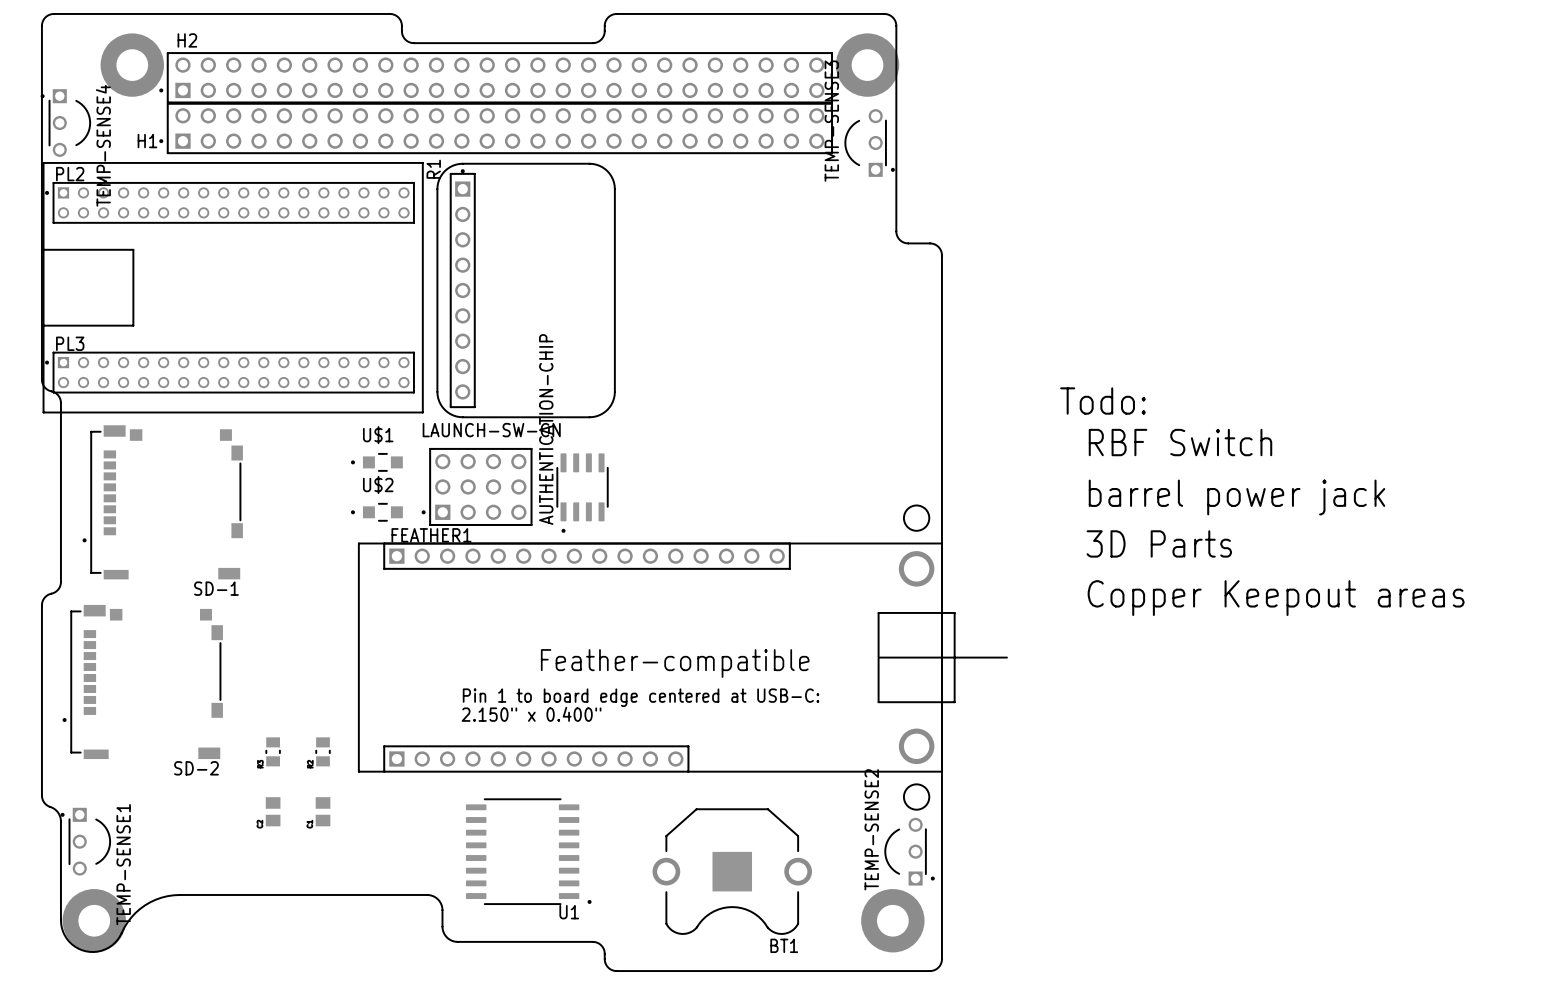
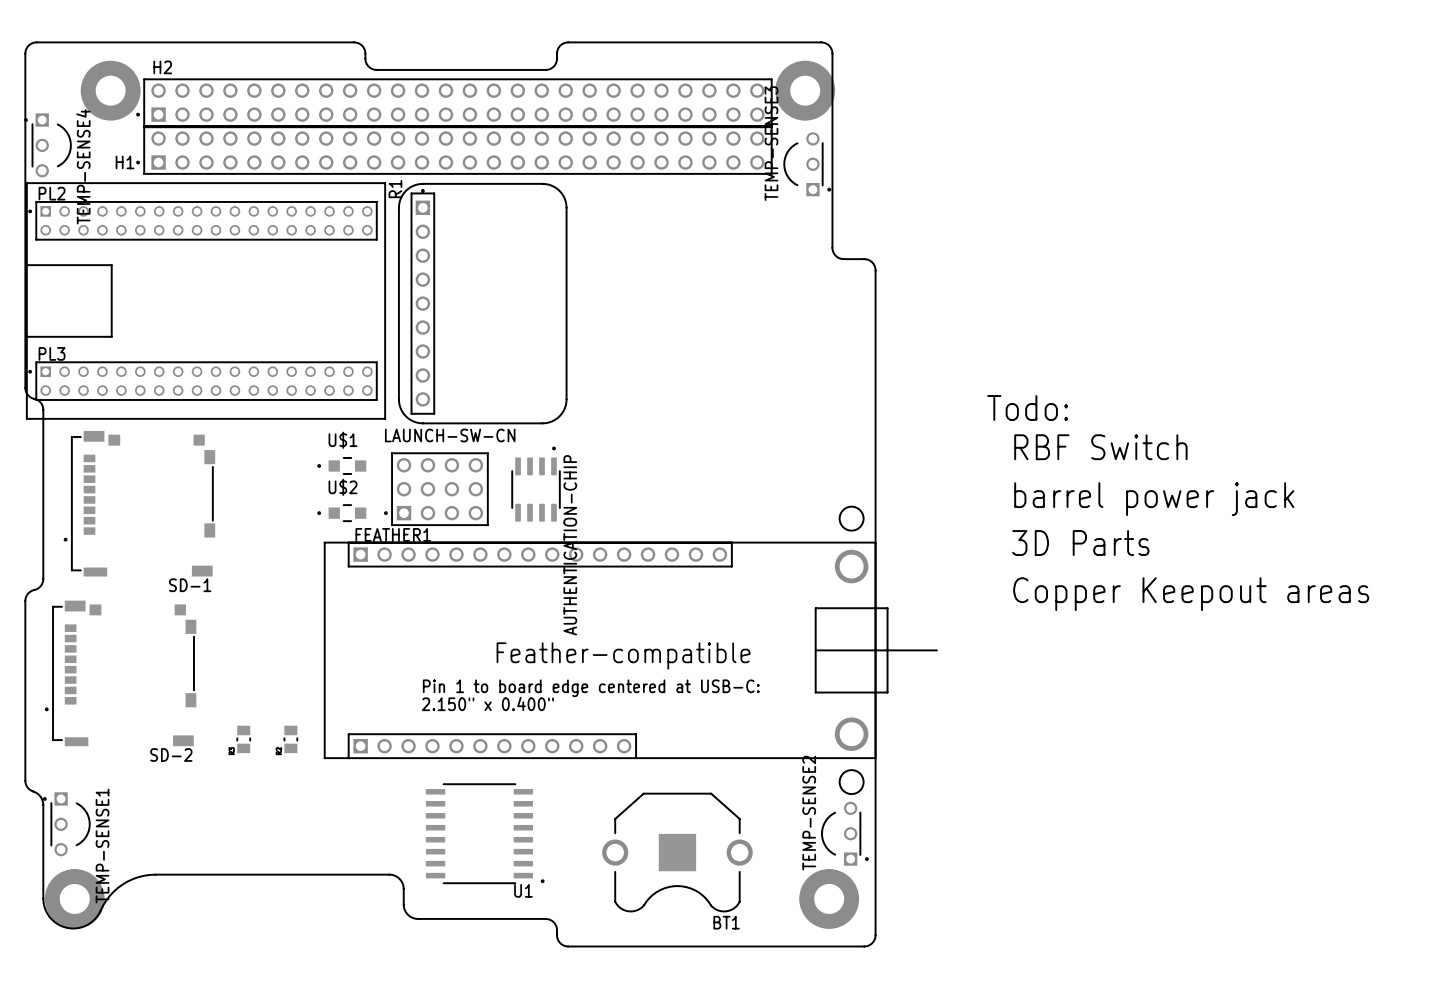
AUTHENTICATION-CHIP rotation: 0° (582, 493) -> 180° (536, 484)
part: (273, 811) -> none
part: (323, 811) -> none

